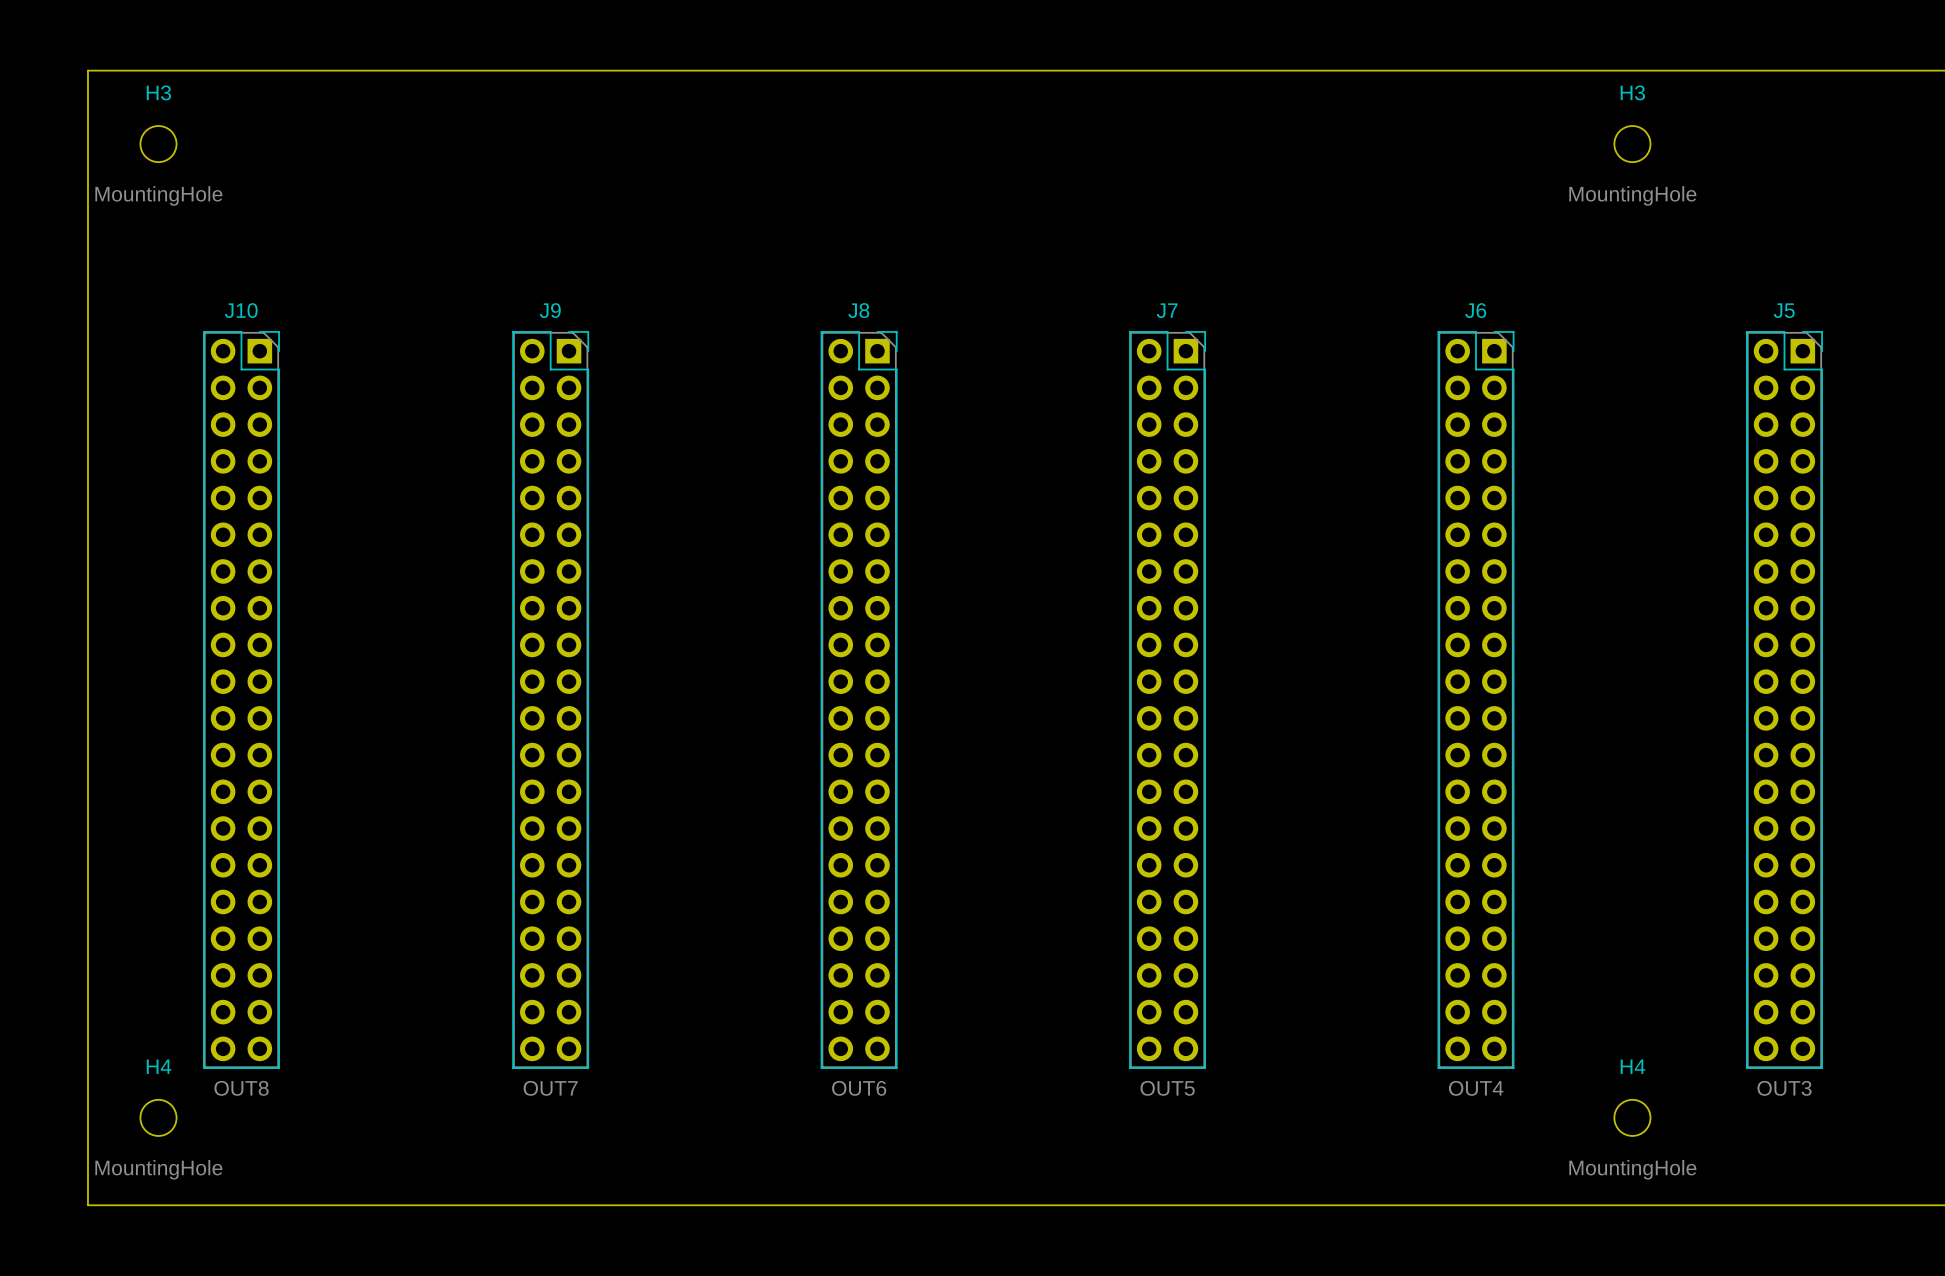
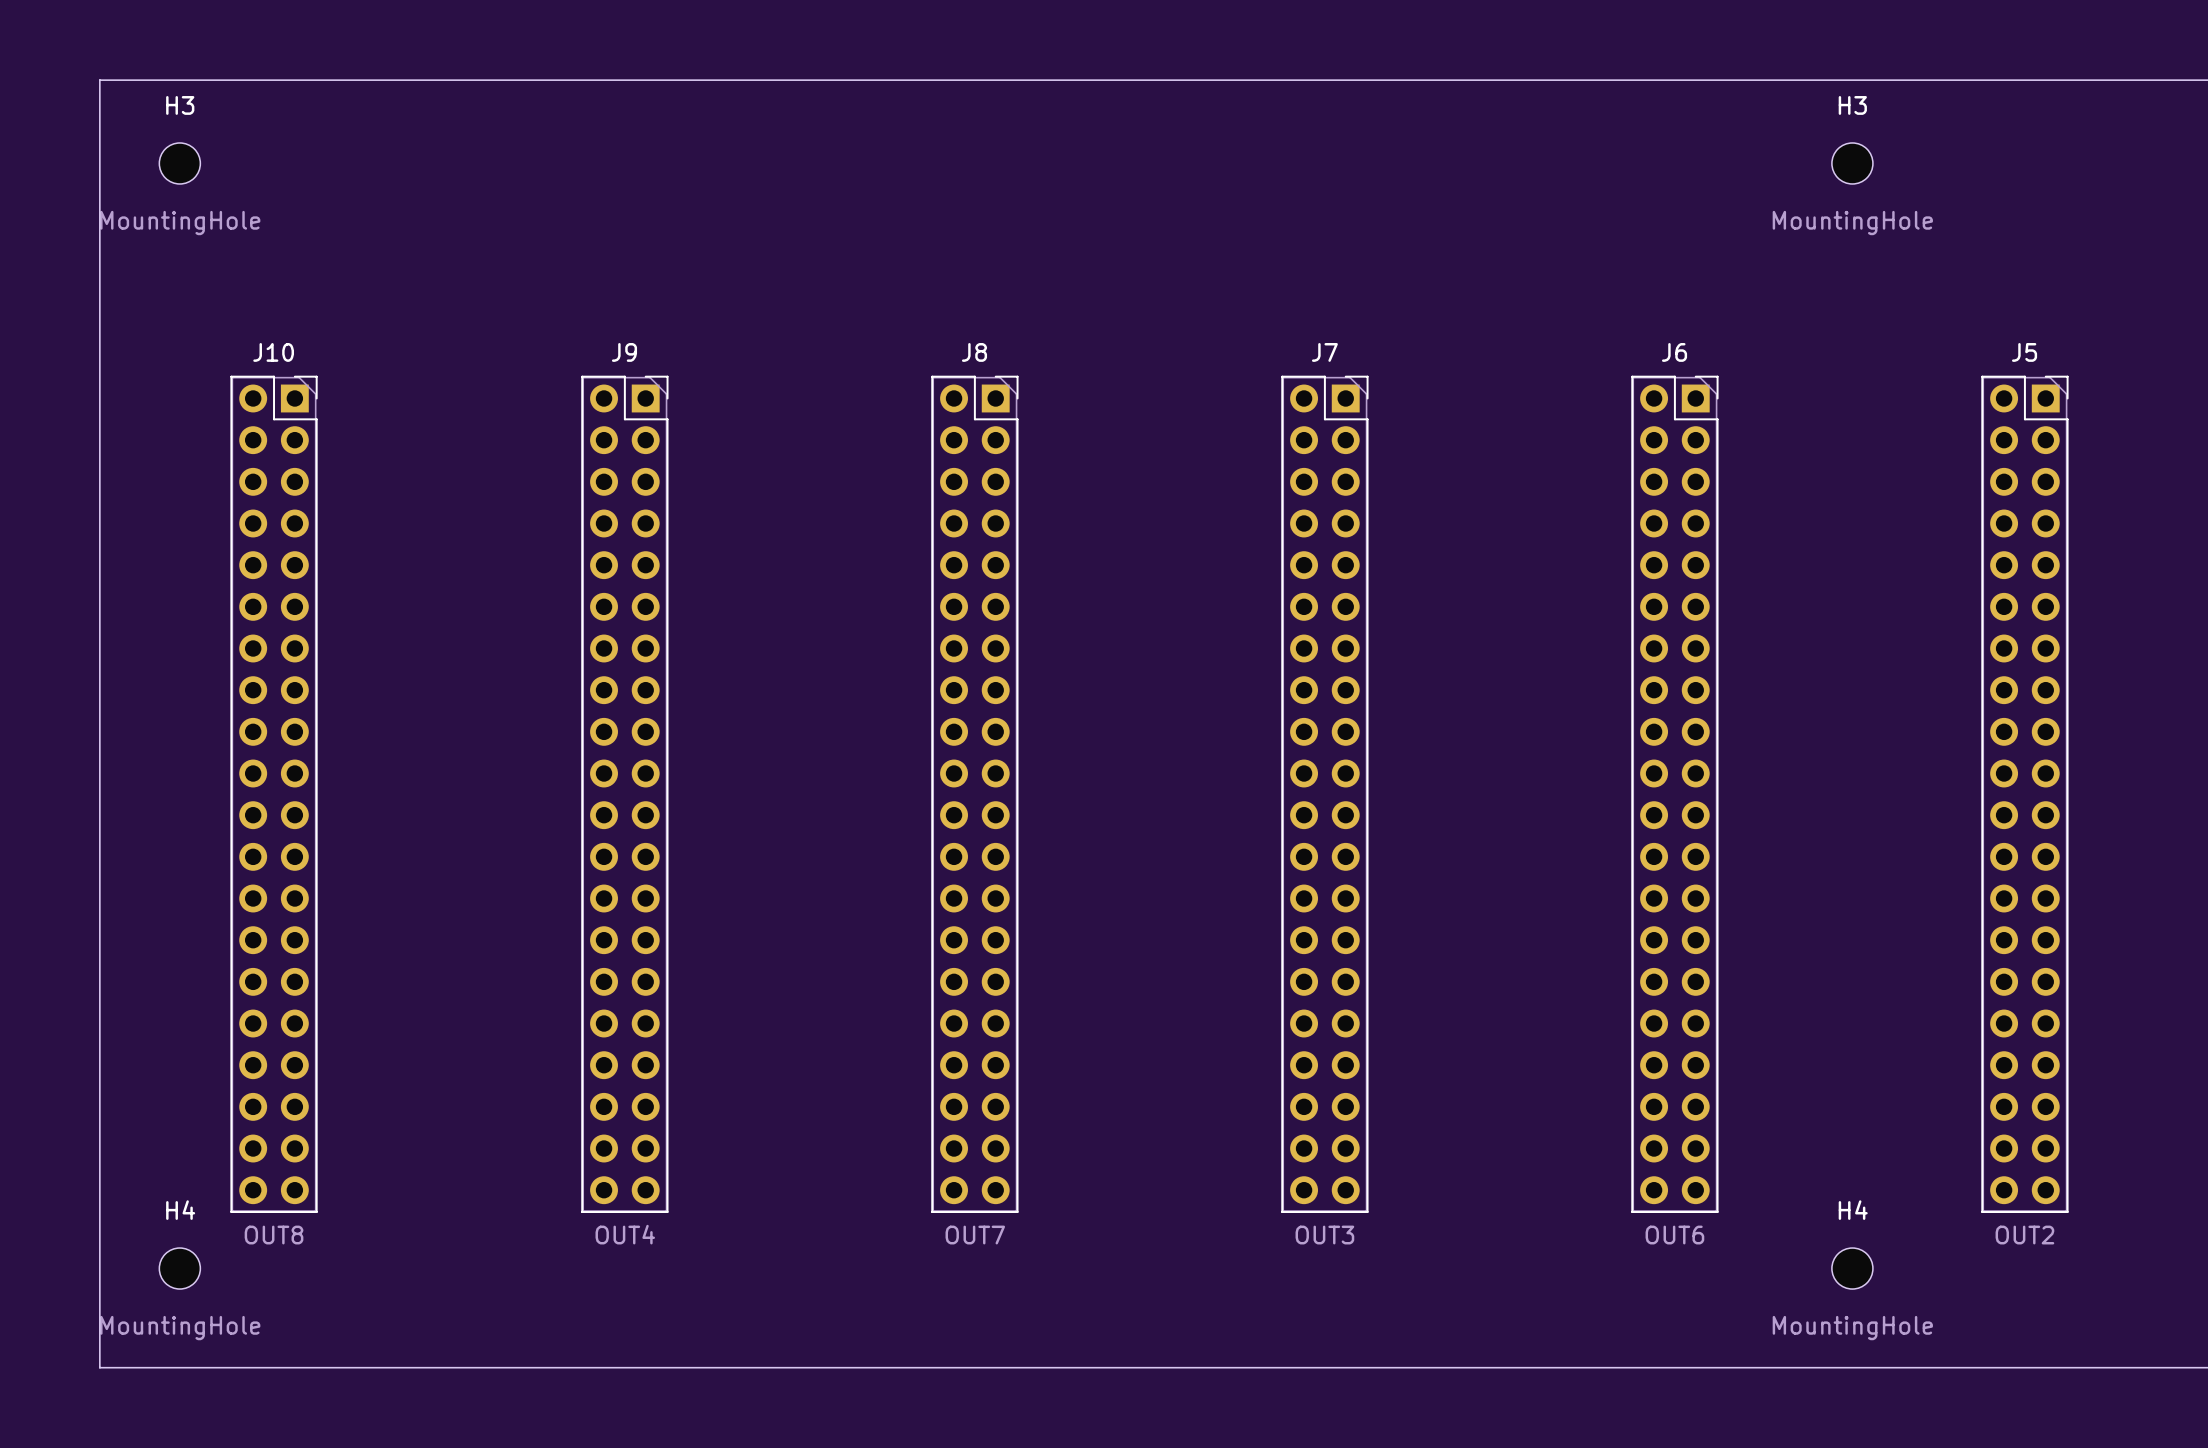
J9 value: OUT7 (550, 1088) -> OUT4 (625, 1234)
J8 value: OUT6 (859, 1088) -> OUT7 (975, 1235)
J7 value: OUT5 (1167, 1088) -> OUT3 (1324, 1235)
J6 value: OUT4 (1476, 1088) -> OUT6 (1674, 1235)
J5 value: OUT3 (1784, 1088) -> OUT2 (2024, 1235)

